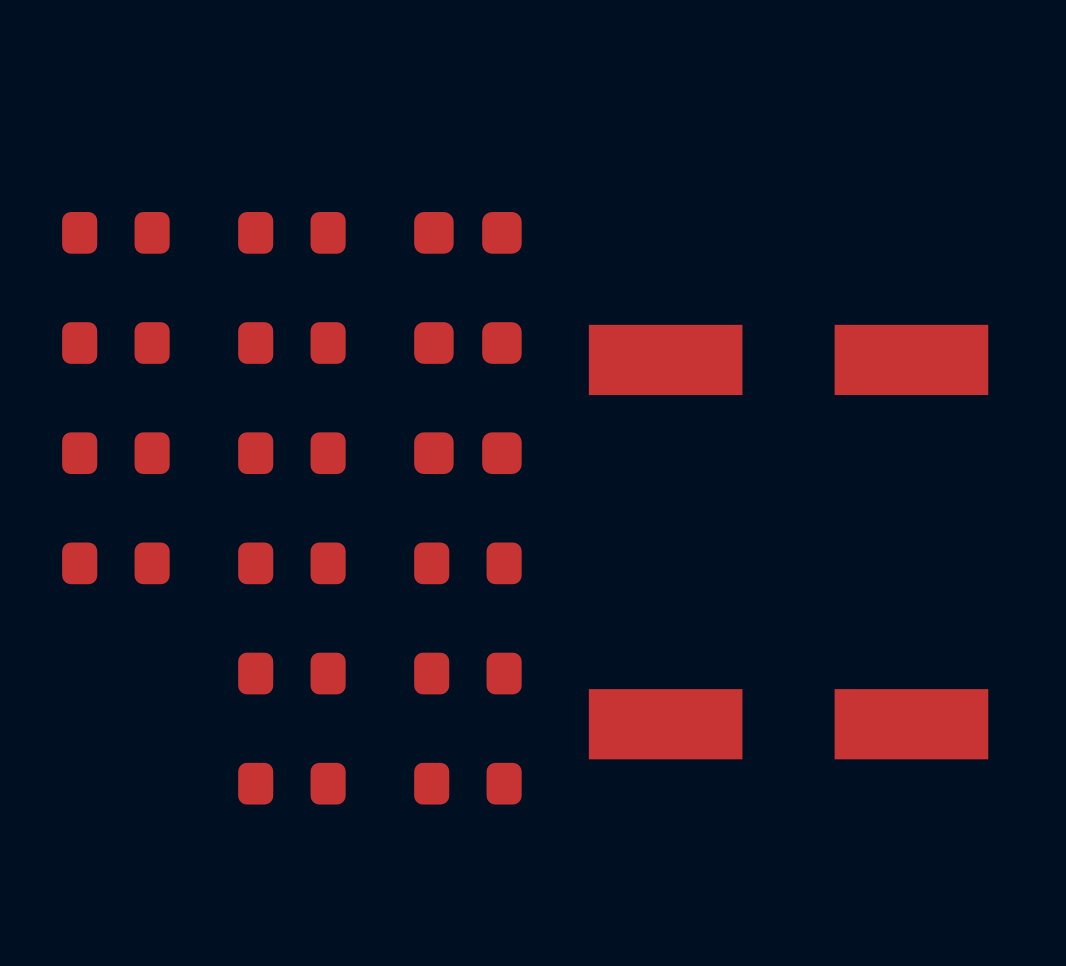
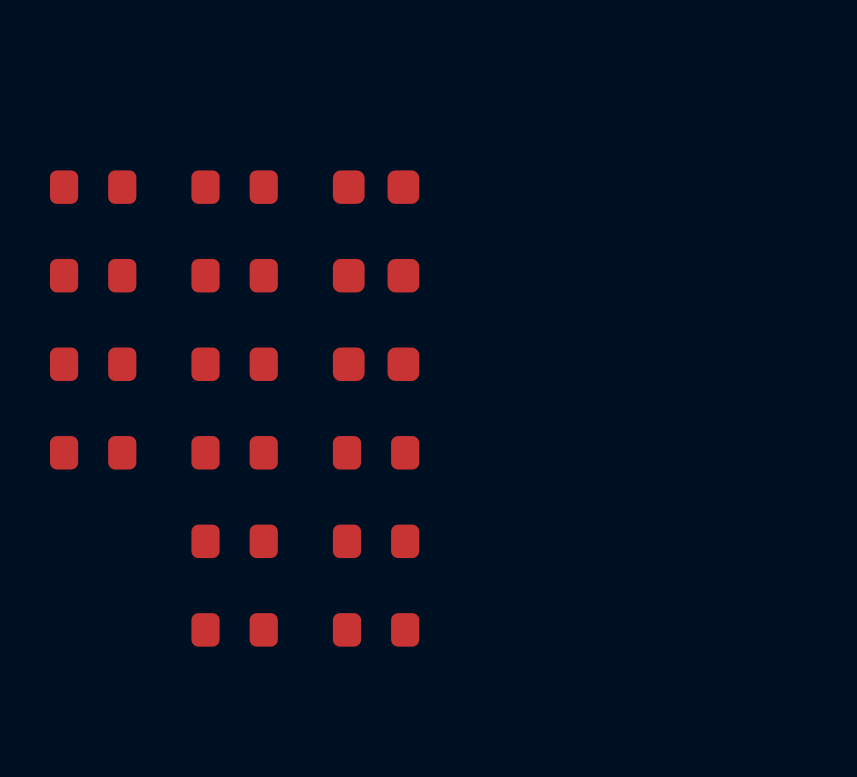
part: (788, 359) -> none
part: (788, 724) -> none

